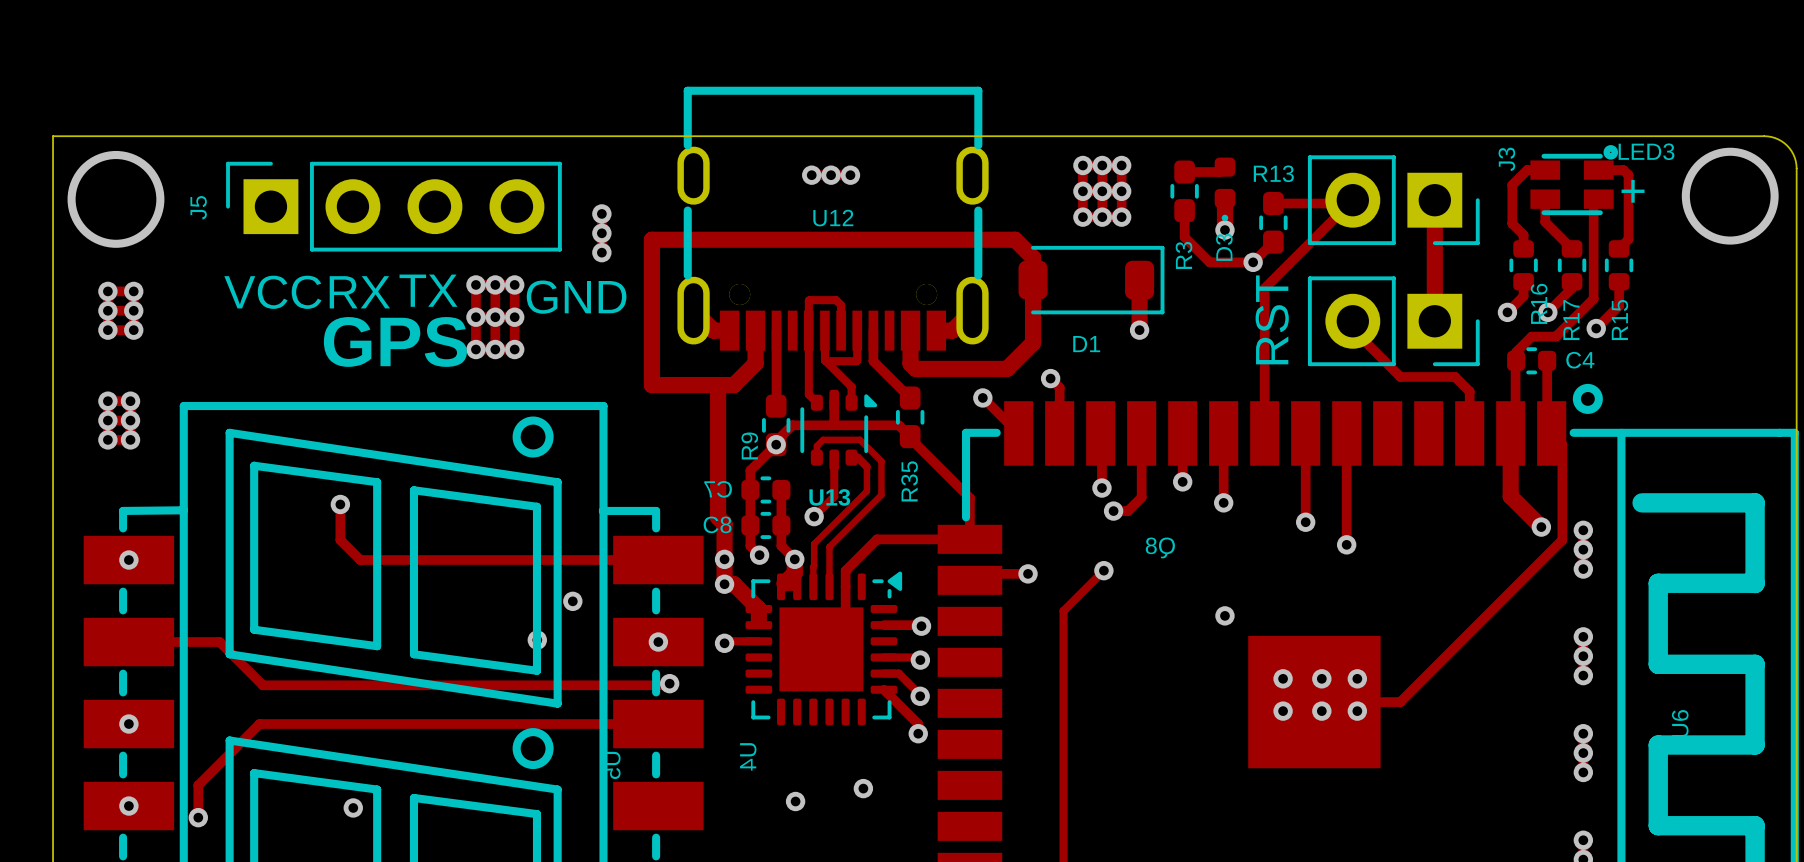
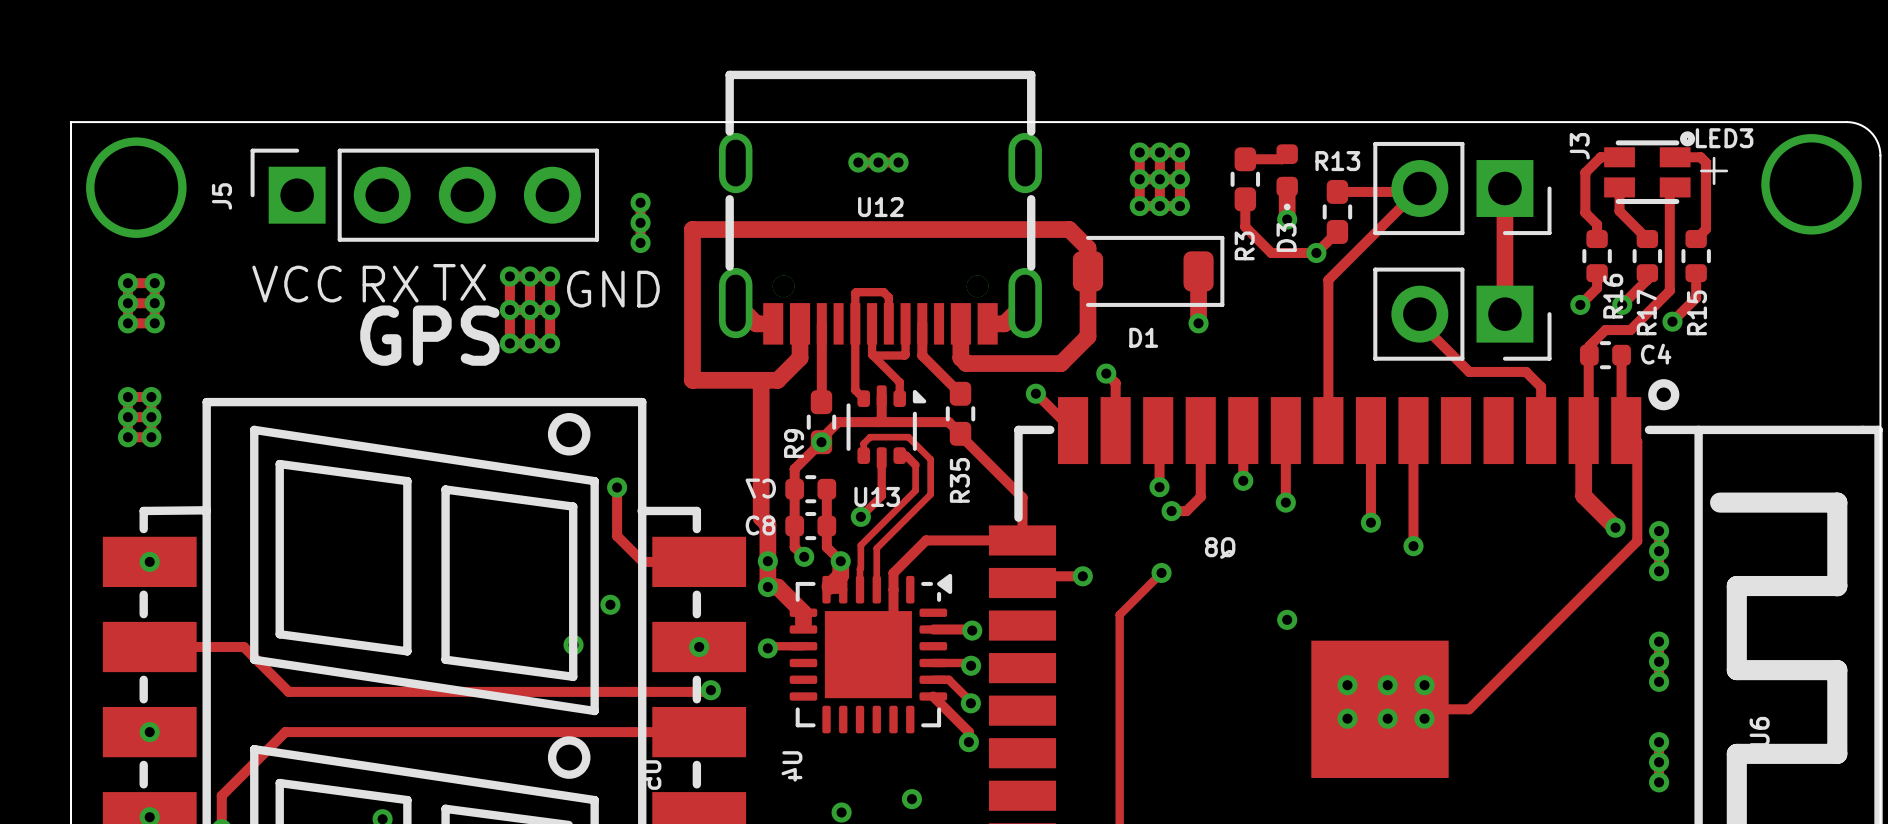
RST name: RST (1272, 319) -> none
via: none -> (617, 487)
track: (340, 504) (340, 540) (360, 560) (604, 560) -> (617, 487) (617, 536) (642, 561)
via: (340, 504) -> none

